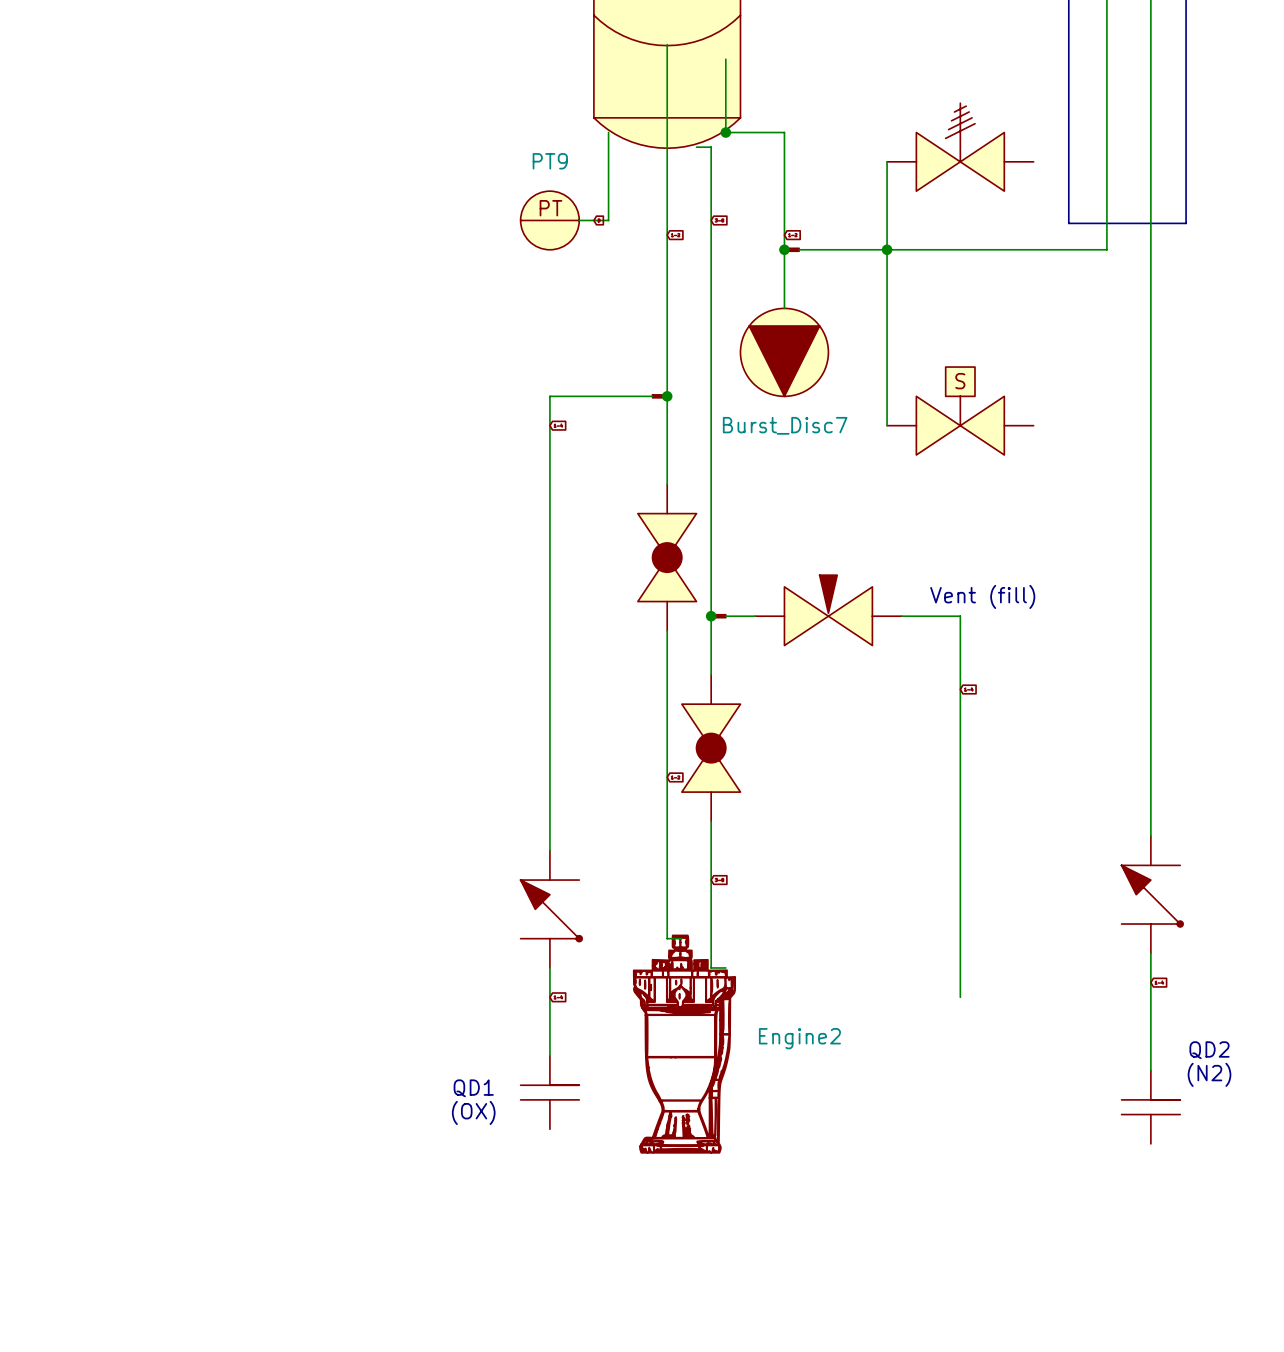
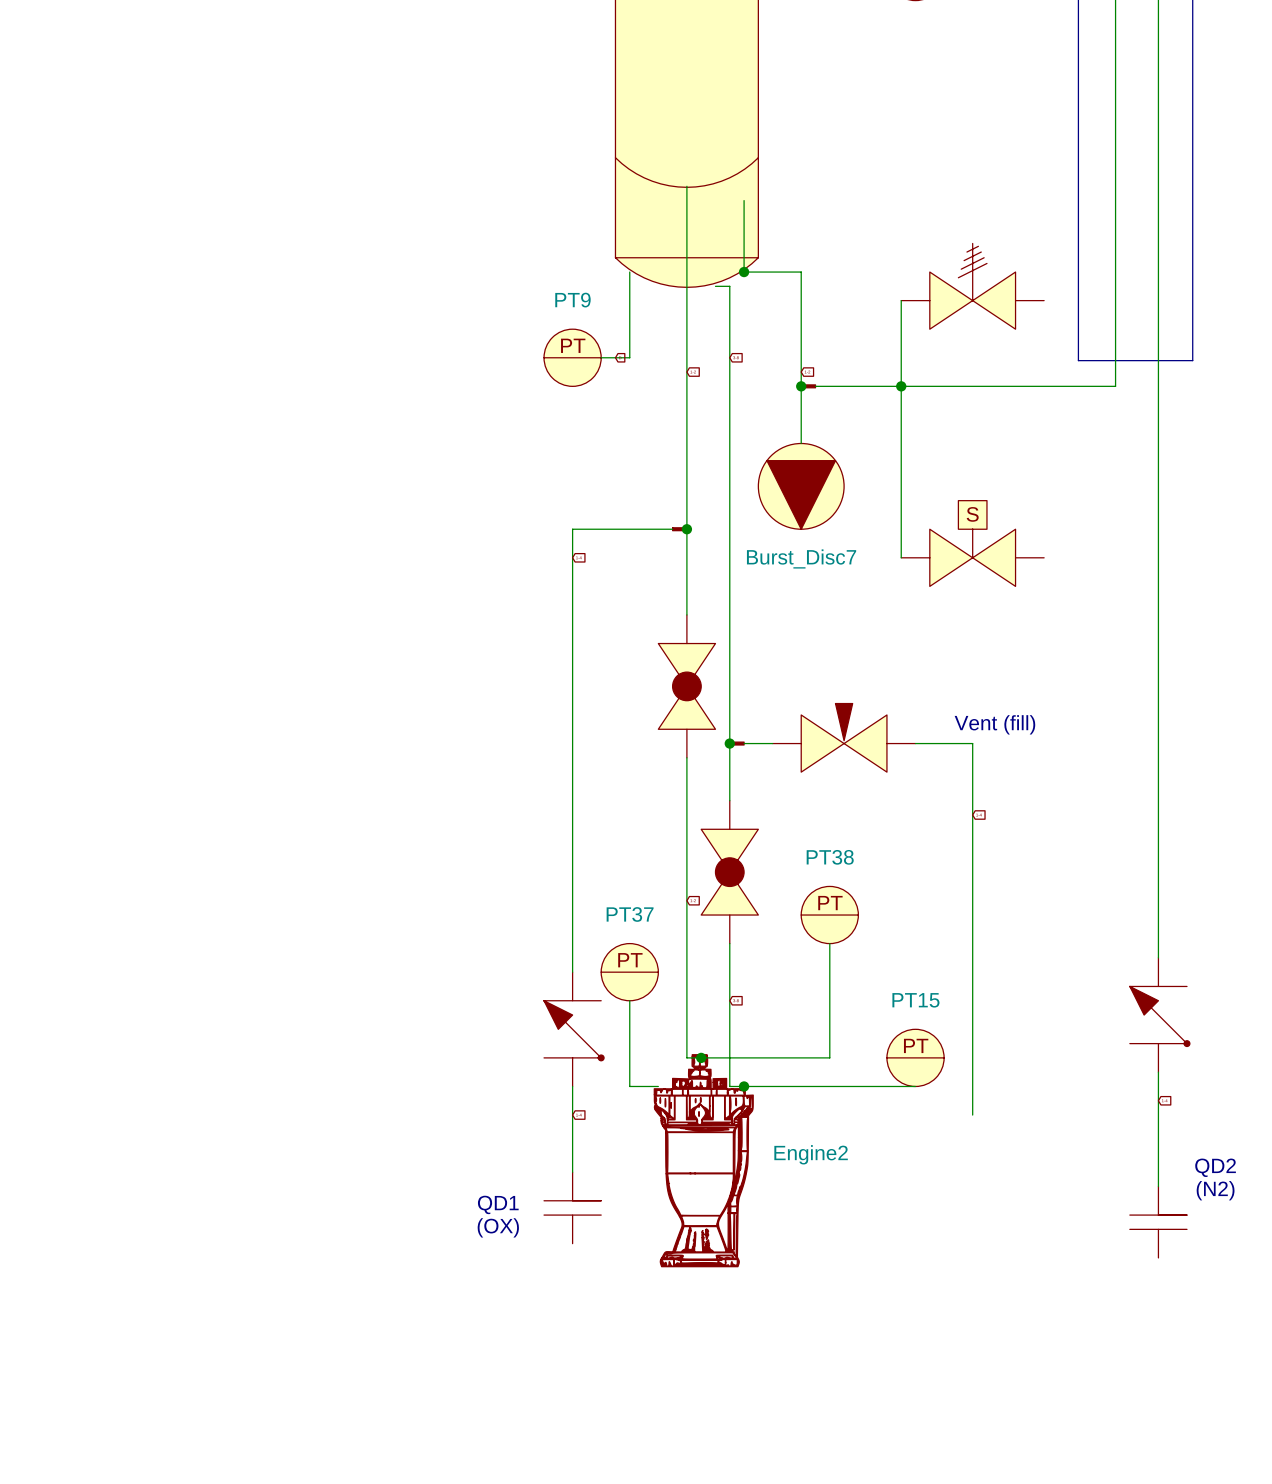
PT38: none -> (829, 915)
wire: none -> (829, 943) (829, 1057) (701, 1057)
PT37: none -> (629, 972)
wire: none -> (629, 1000) (629, 1086) (658, 1086)
junction: none -> (701, 1057)
PT15: none -> (915, 1057)
wire: none -> (744, 1086) (915, 1086)
junction: none -> (744, 1086)

